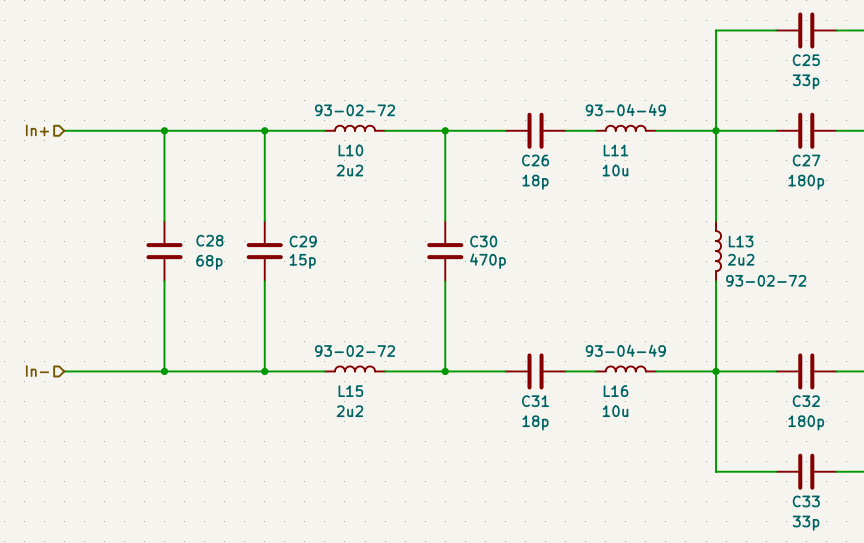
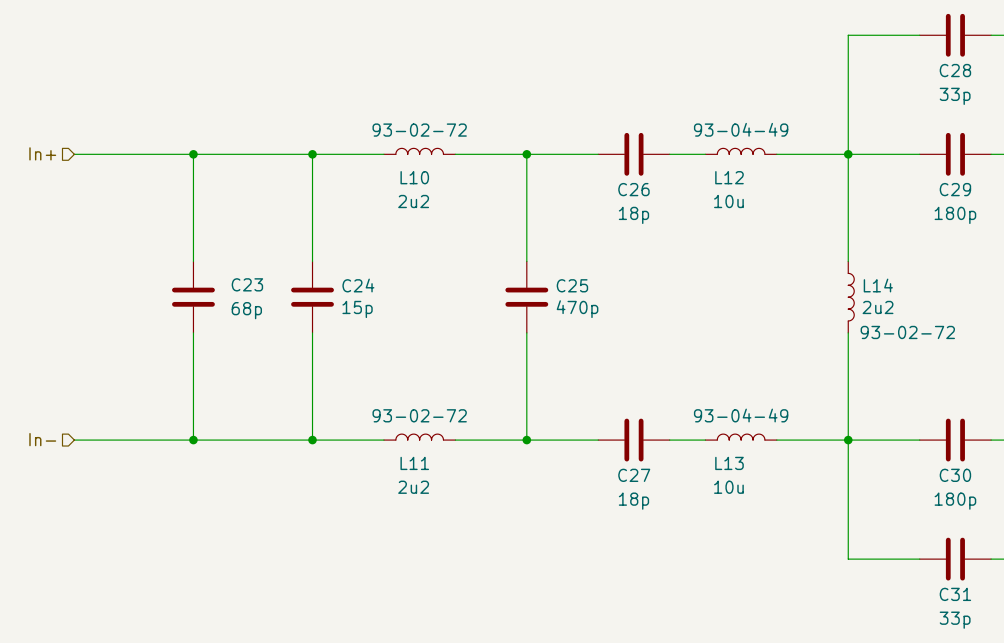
C25 name: C25 (806, 60) -> C28 (955, 70)
L11 name: L11 (615, 150) -> L12 (729, 177)
C27 name: C27 (806, 160) -> C29 (955, 189)
C28 name: C28 (209, 240) -> C23 (247, 284)
C29 name: C29 (303, 241) -> C24 (358, 285)
C30 name: C30 (483, 241) -> C25 (572, 285)
L13 name: L13 (741, 241) -> L14 (878, 285)
L15 name: L15 (350, 391) -> L11 (414, 463)
L16 name: L16 (615, 391) -> L13 (729, 463)
C31 name: C31 (535, 401) -> C27 (634, 475)
C32 name: C32 (806, 401) -> C30 (955, 475)
C33 name: C33 (806, 501) -> C31 (955, 594)

